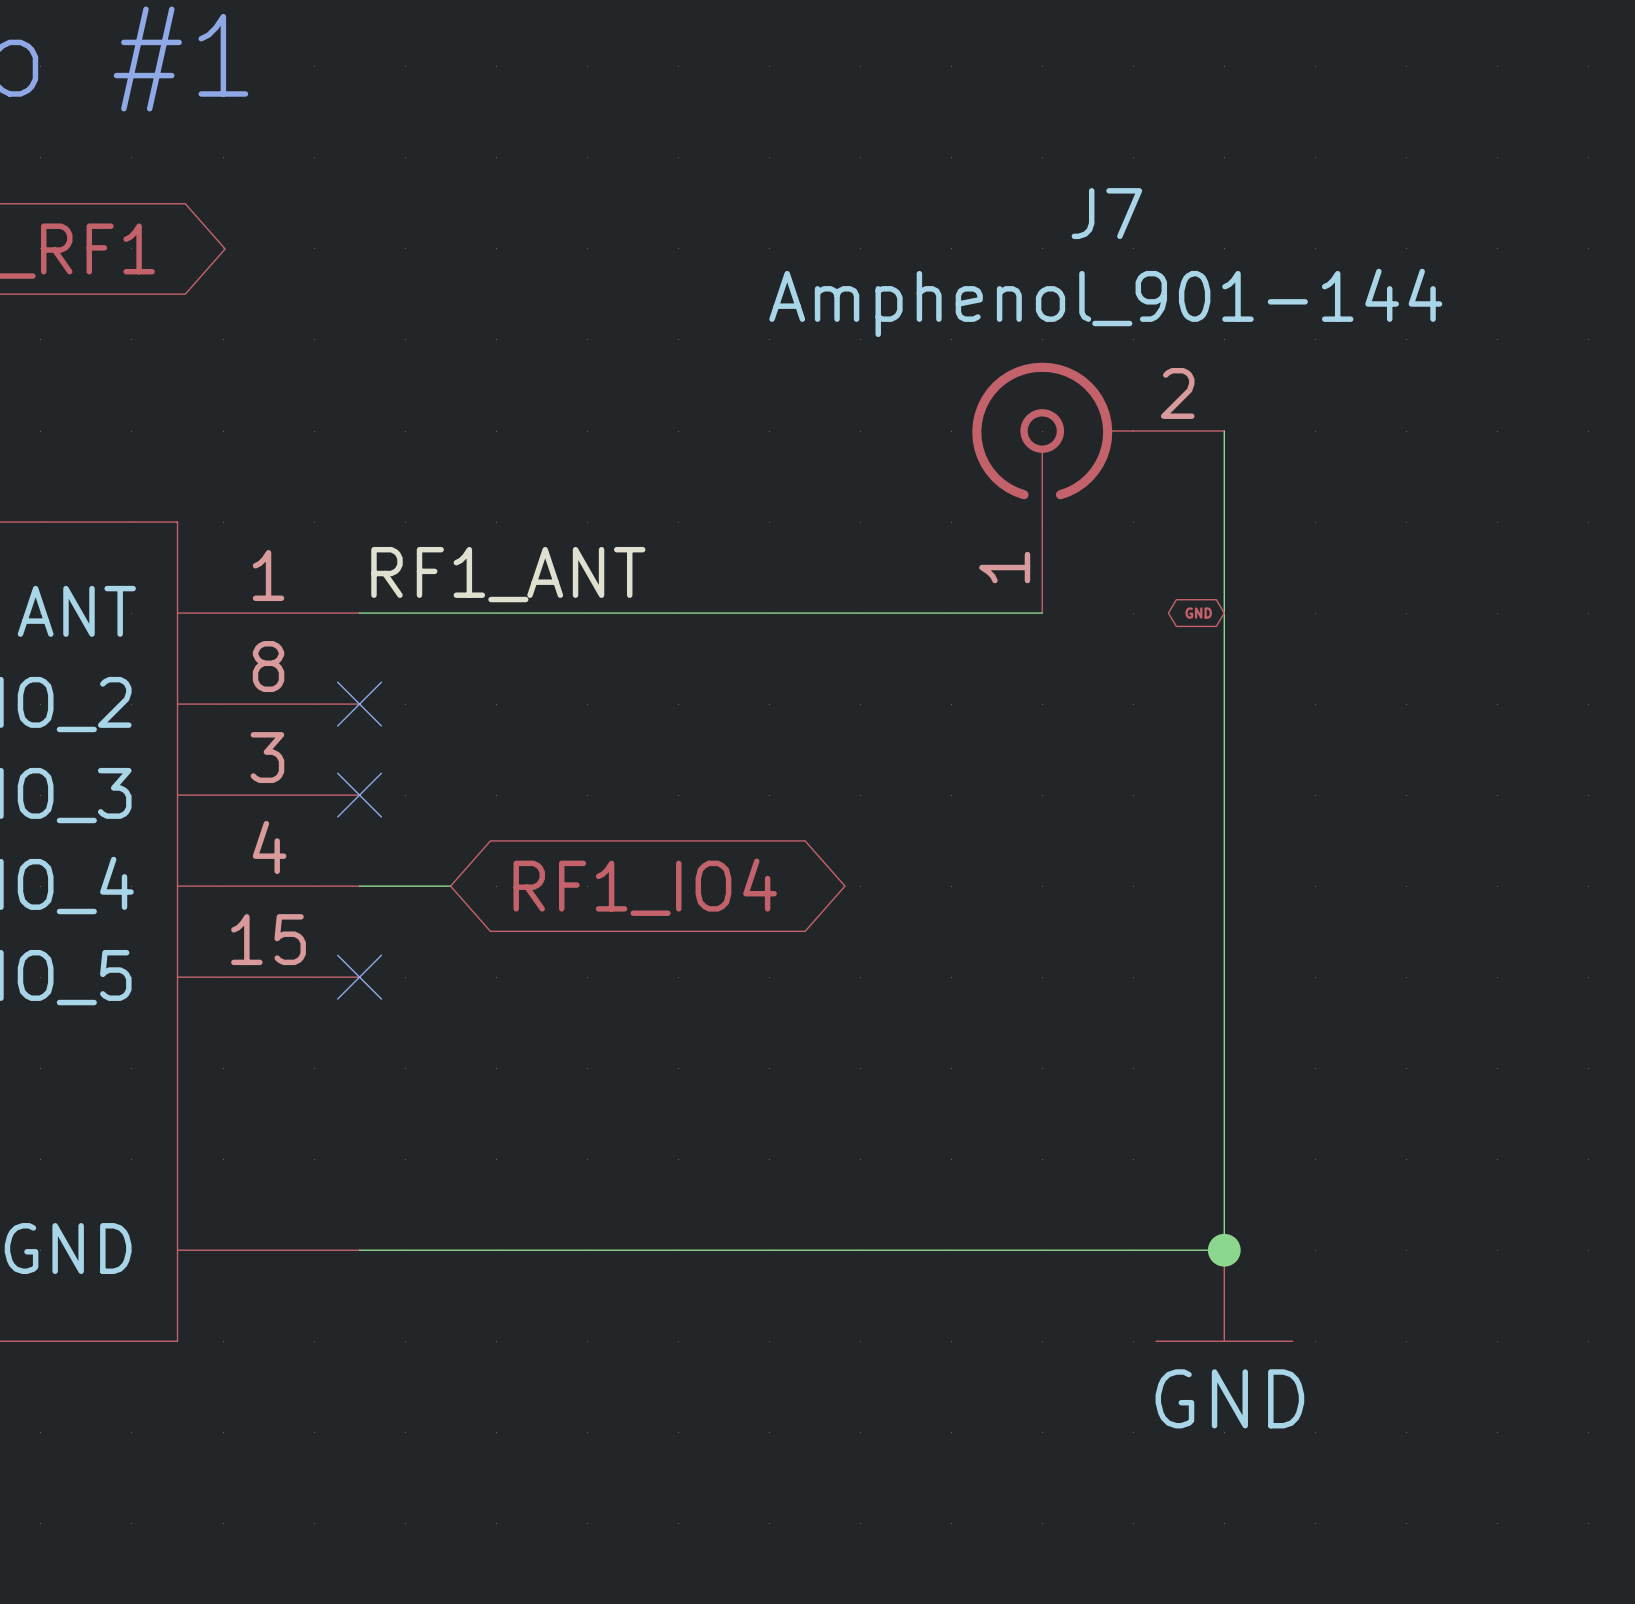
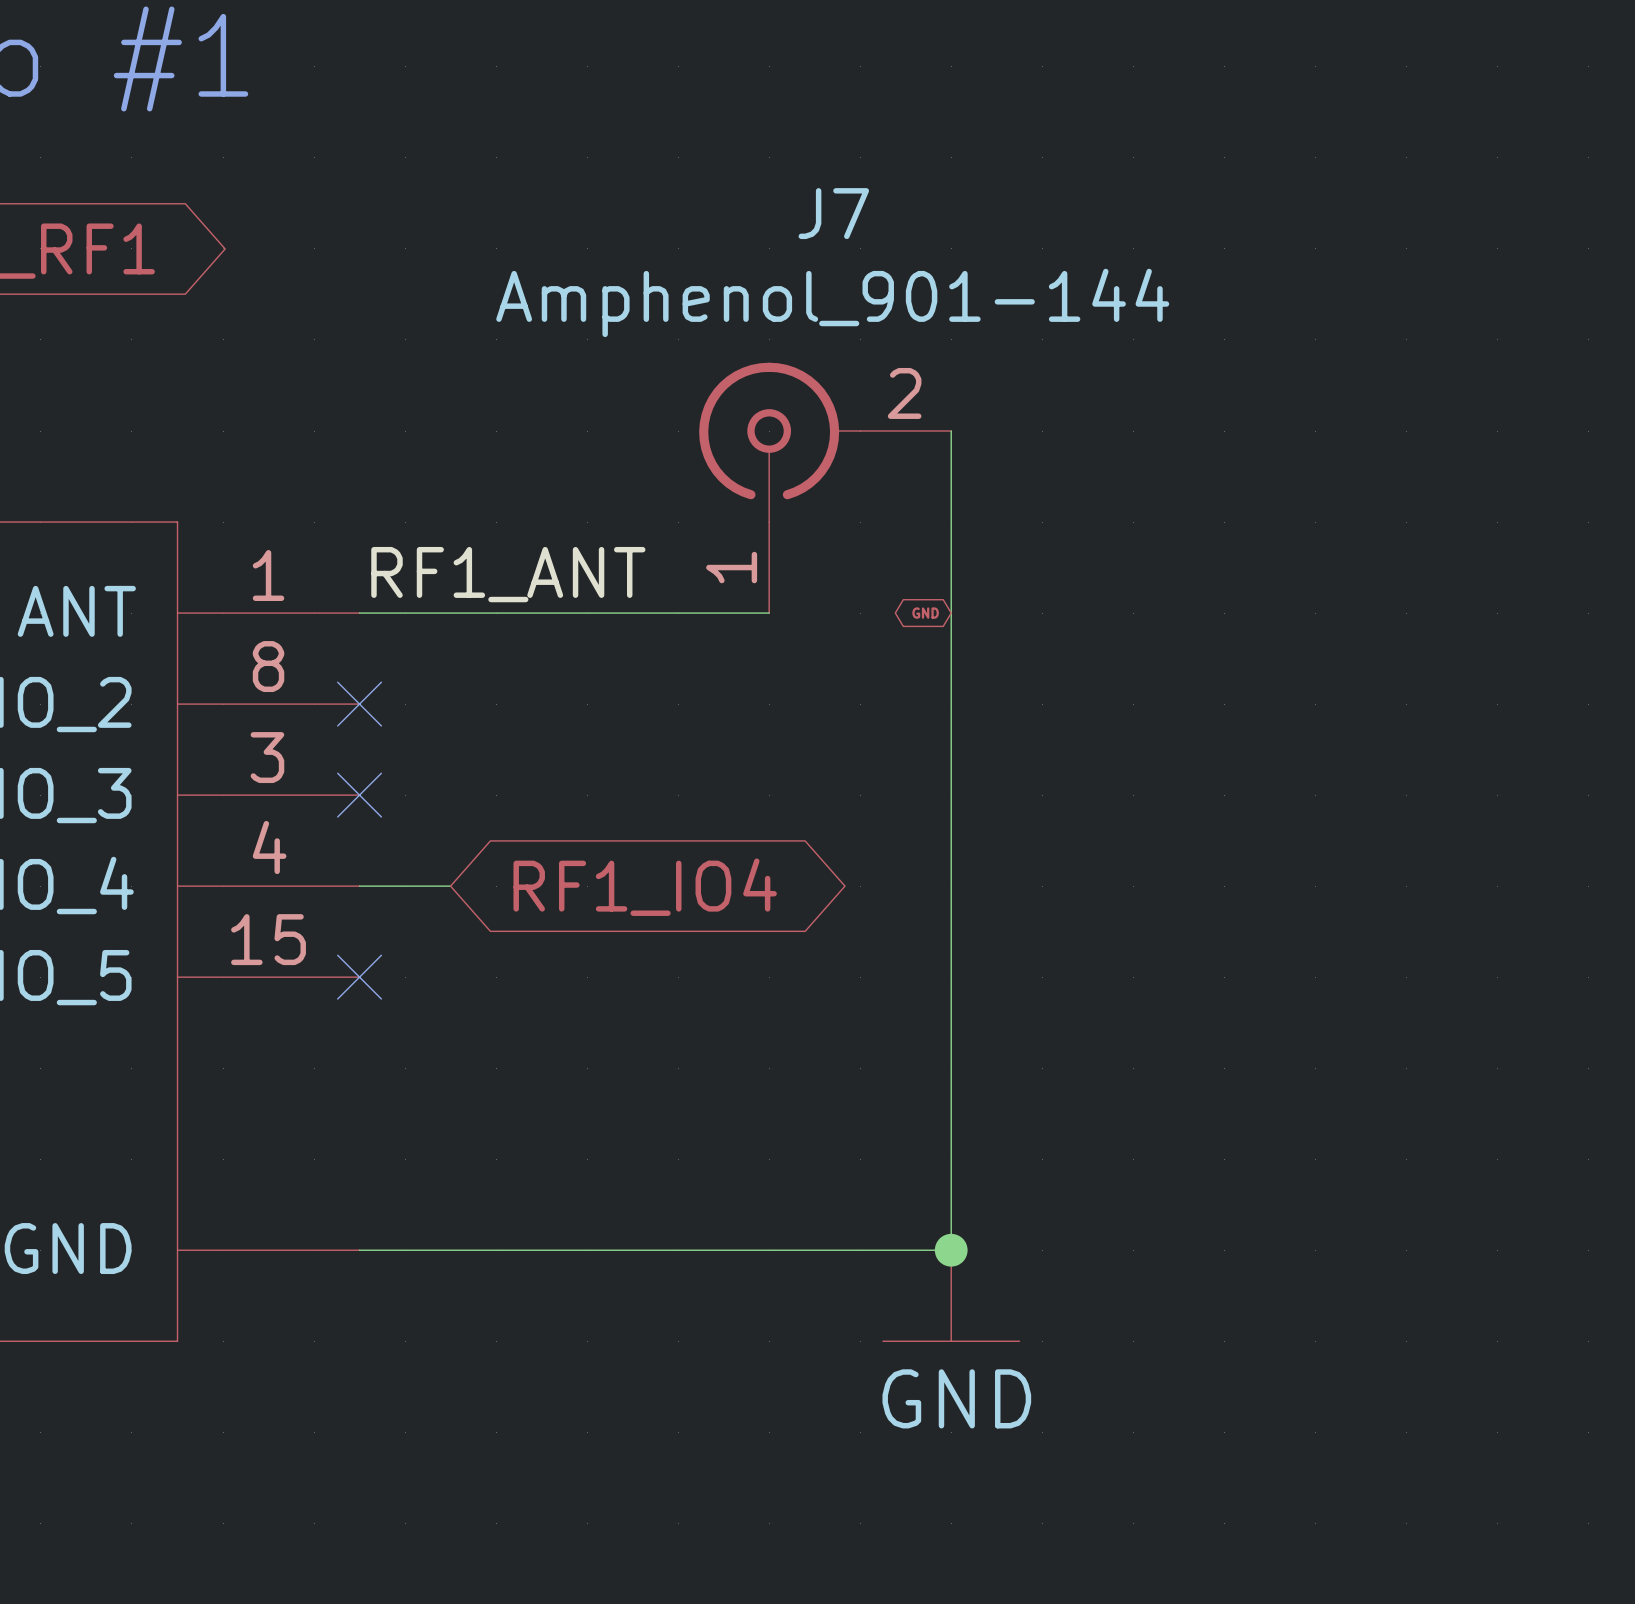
wire: (1224, 431) (1224, 1250) (951, 1250) -> (951, 431) (951, 1250)
J7 position: (1098, 487) -> (825, 487)
wire: (769, 613) (1042, 613) -> none
global label position: GND (1198, 613) -> GND (925, 613)
junction: none -> (951, 1250)
junction: (1224, 1250) -> none
power symbol position: GND (1224, 1295) -> GND (951, 1295)

